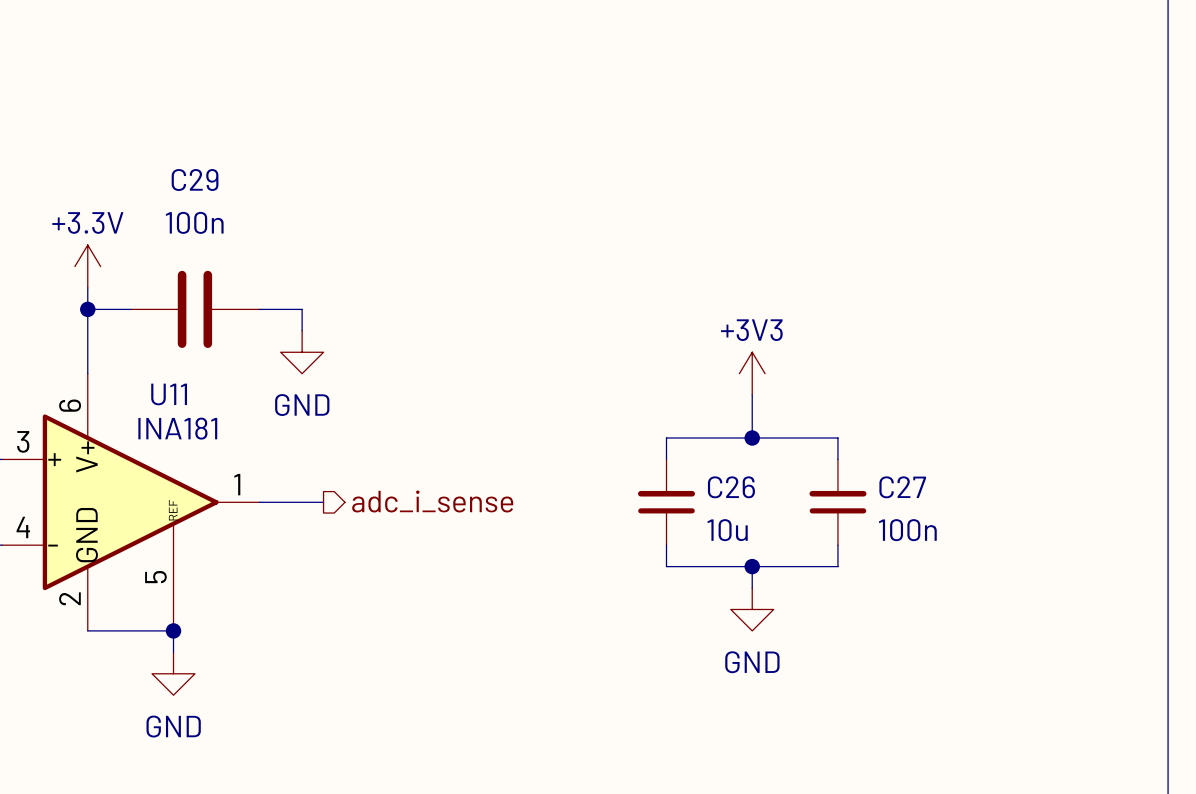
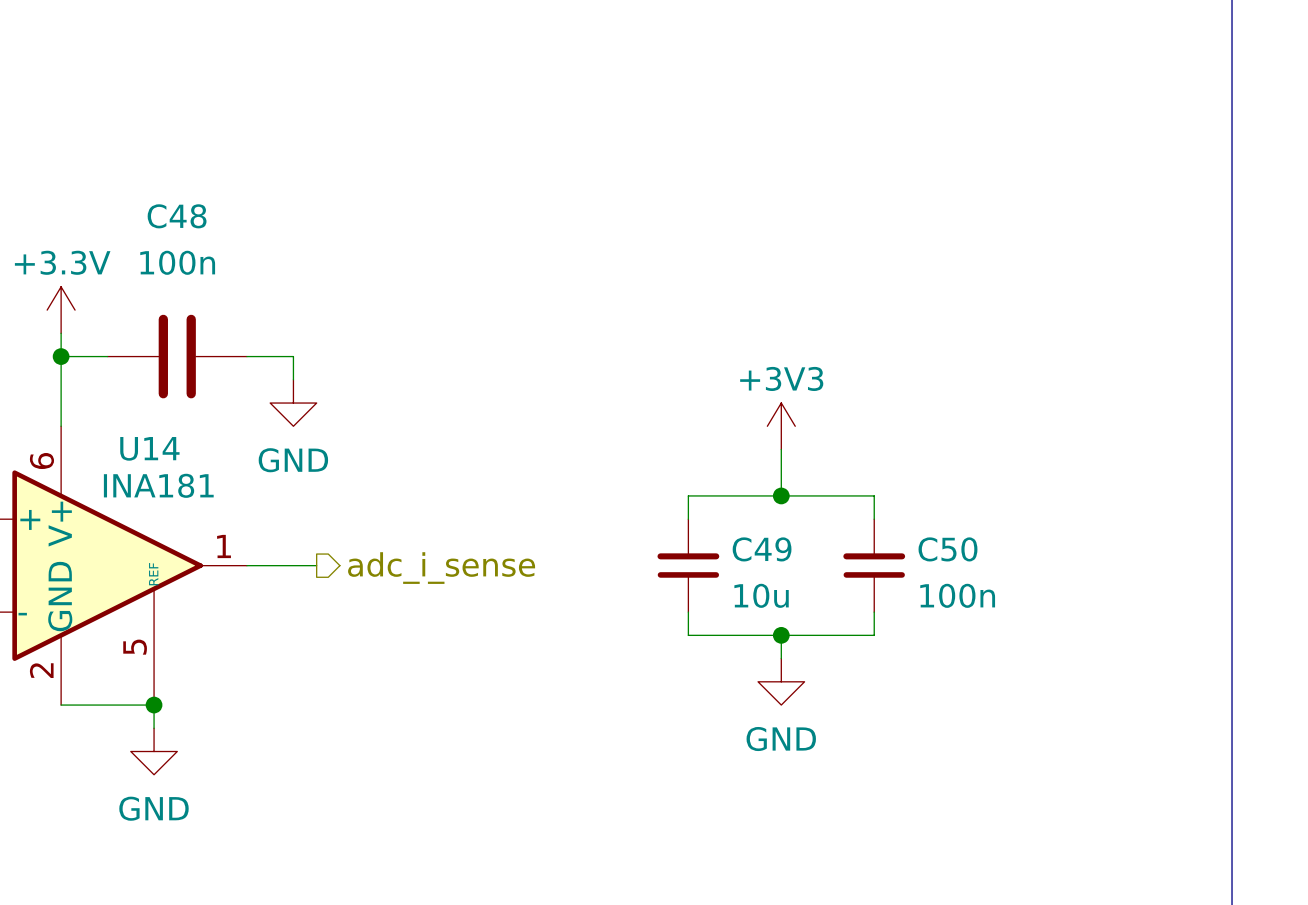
C29 name: C29 (195, 180) -> C48 (177, 216)
U11 name: U11 (169, 394) -> U14 (149, 448)
C26 name: C26 (731, 487) -> C49 (762, 549)
C27 name: C27 (902, 487) -> C50 (947, 549)

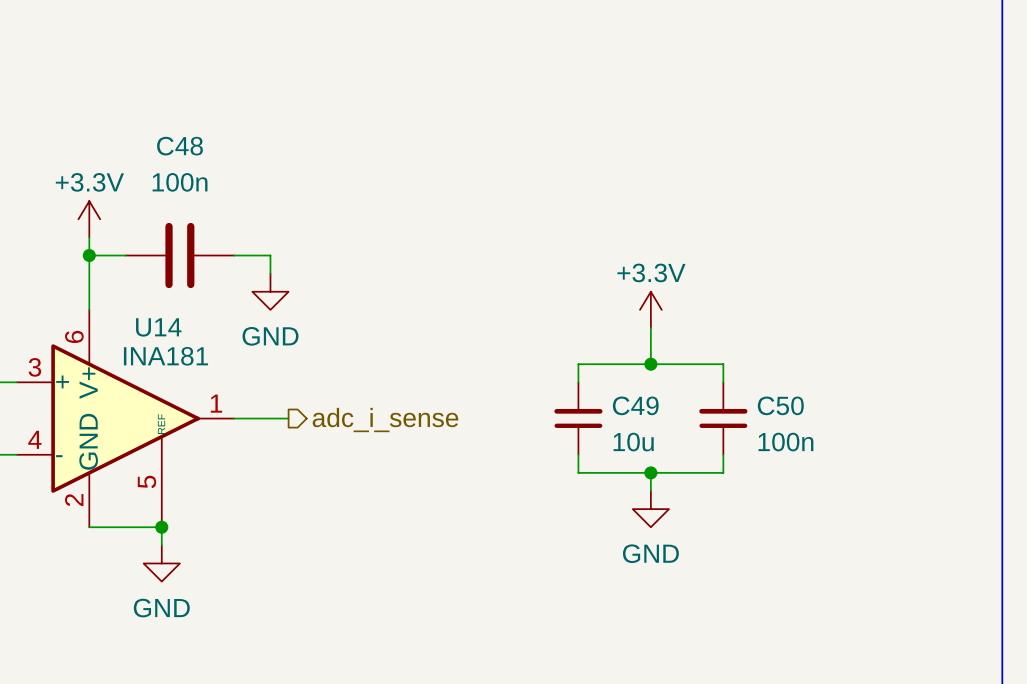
power symbol: +3V3 (781, 426) -> +3.3V (650, 309)

